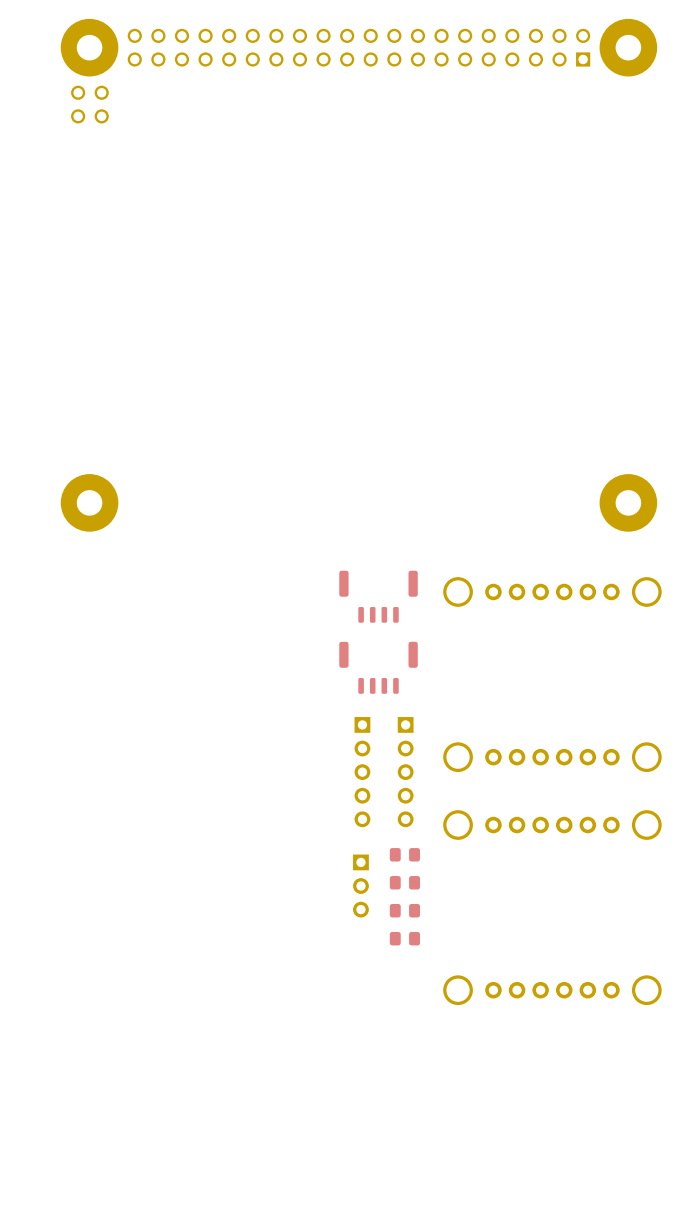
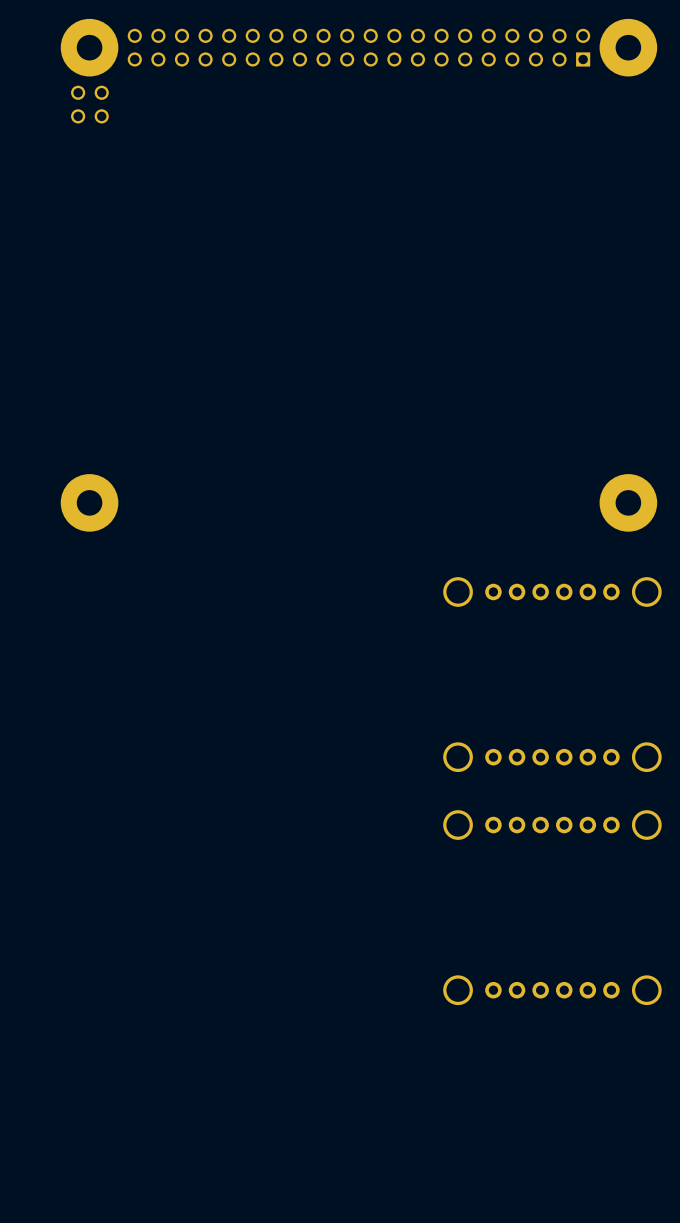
part: (378, 596) -> none
part: (378, 667) -> none
part: (362, 772) -> none
part: (405, 772) -> none
part: (404, 854) -> none
part: (404, 882) -> none
part: (360, 886) -> none
part: (404, 910) -> none
part: (404, 938) -> none

